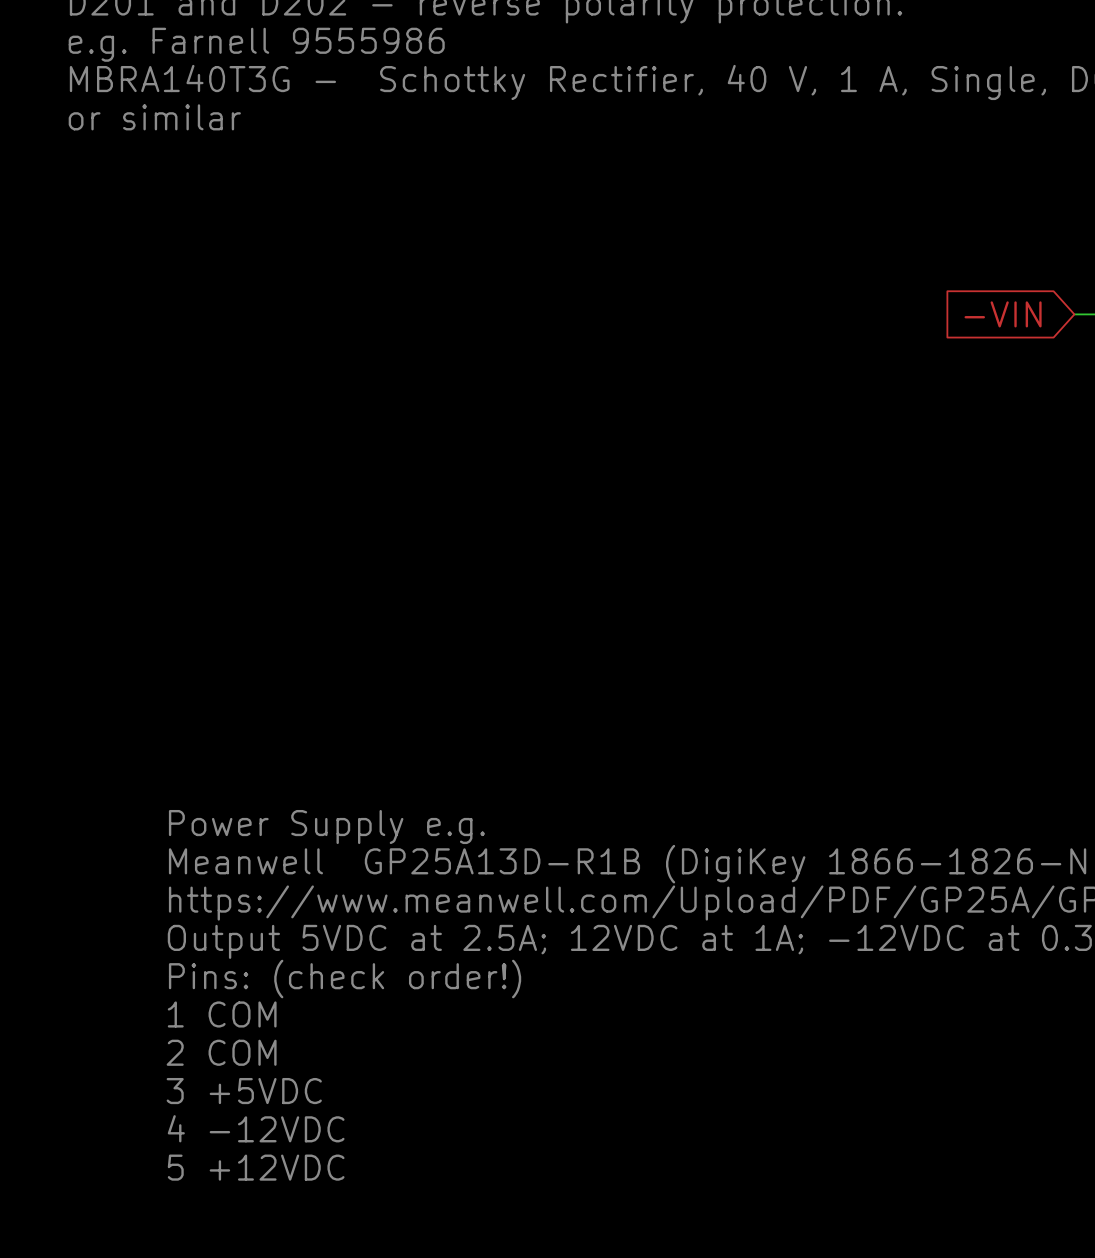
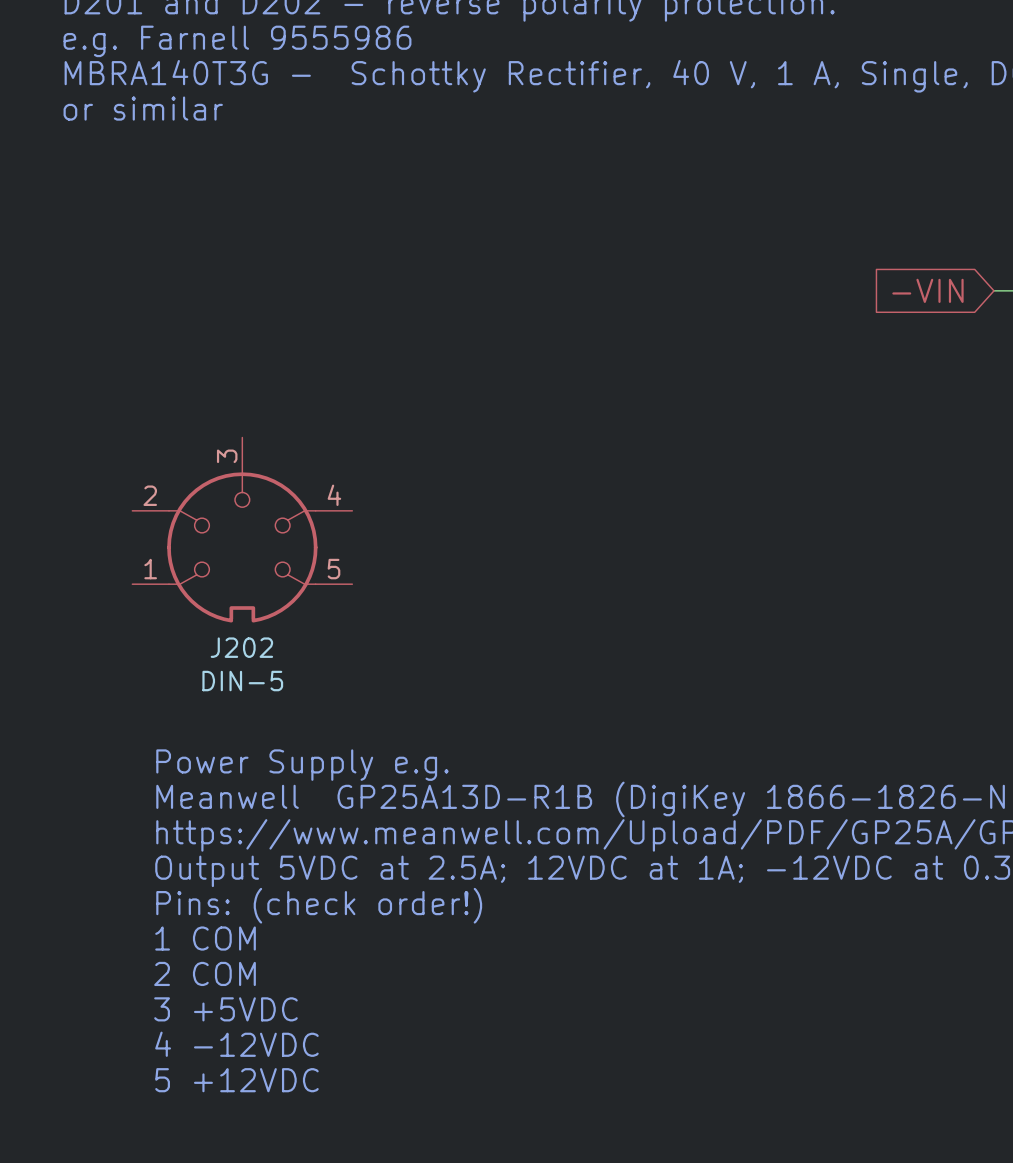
J202: none -> DIN-5 (242, 530)

